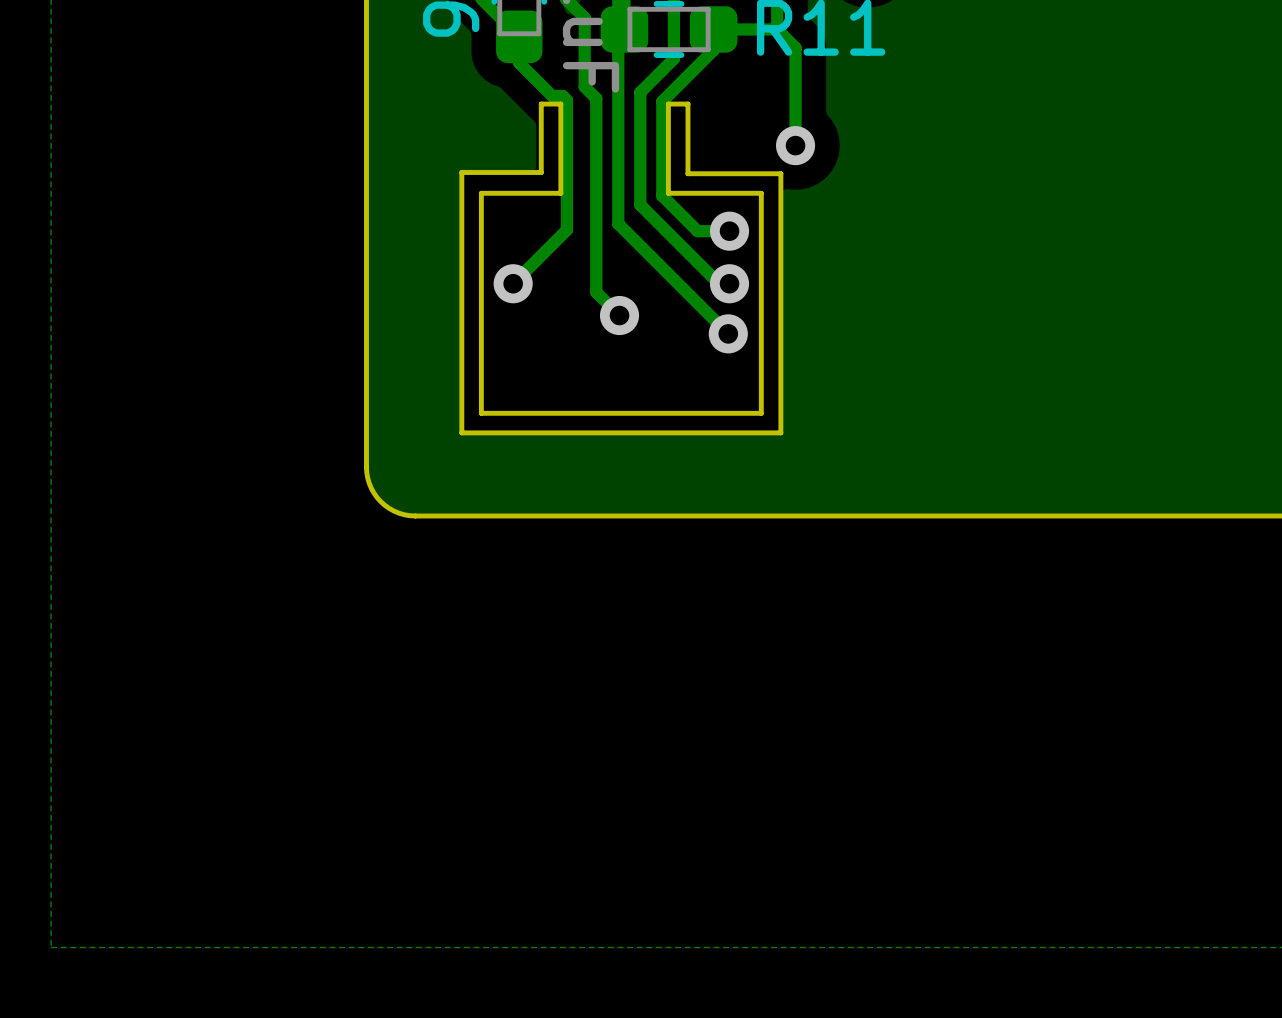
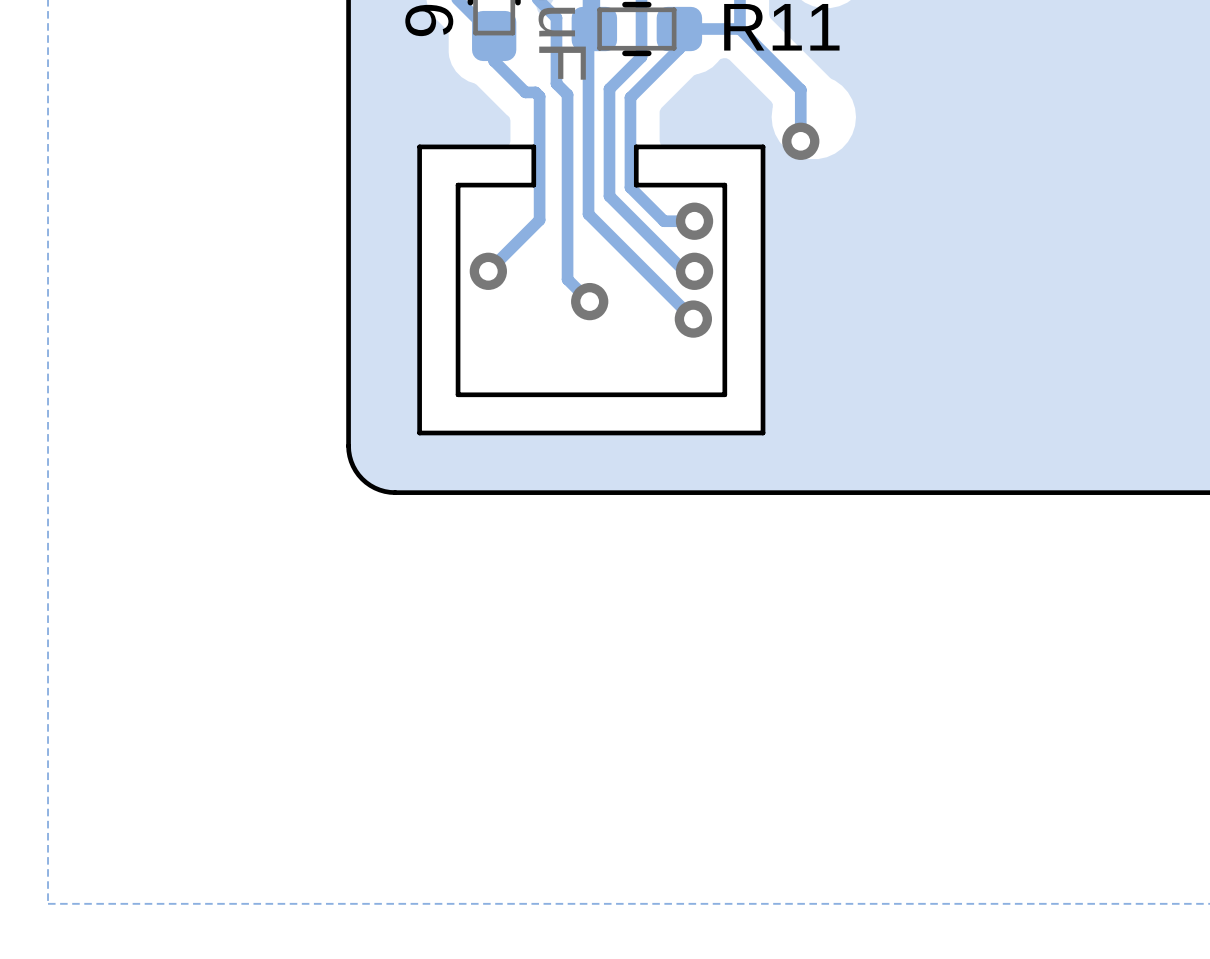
track: (795, 47) (795, 145) -> (757, 46) (800, 89) (800, 141)
via position: (795, 145) -> (800, 141)
board edge: (668, 153) (668, 104) (687, 104) (687, 173) (780, 173) (780, 432) (461, 432) (461, 172) (541, 172) (541, 104) (560, 104) (560, 153) -> (636, 146) (763, 146) (763, 433) (419, 433) (419, 146) (533, 146)

